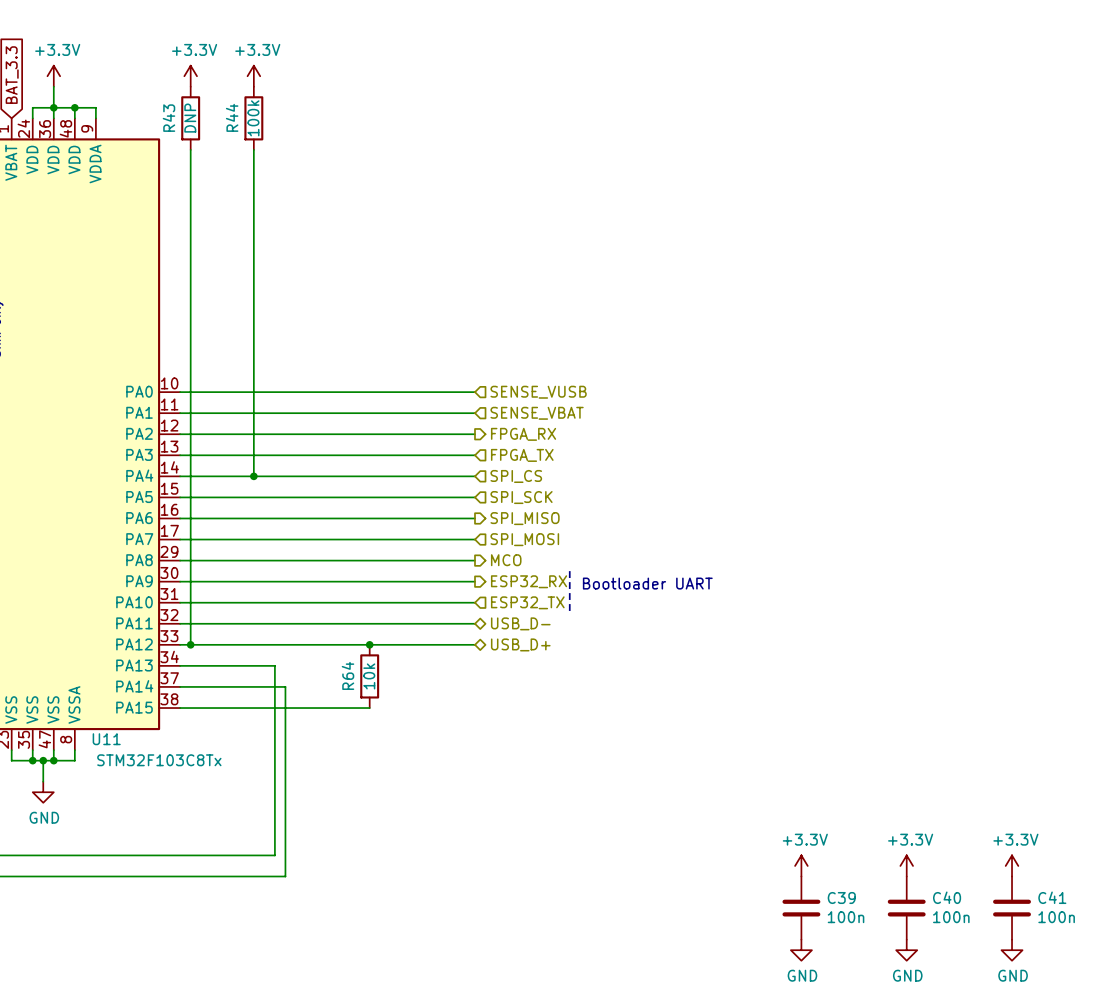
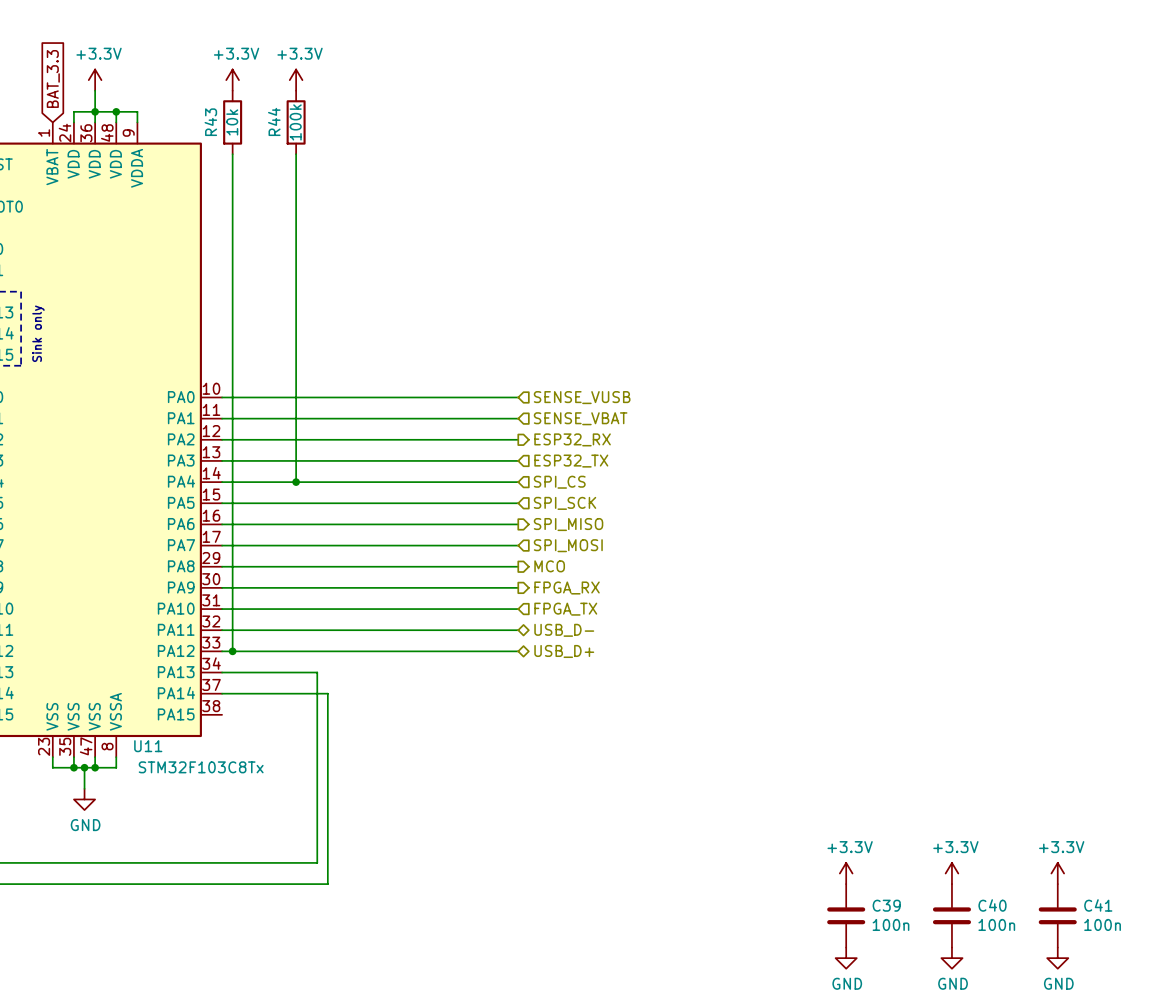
R43 value: DNP (190, 118) -> 10k (232, 122)
hierarchical label: FPGA_RX (523, 434) -> ESP32_RX (572, 439)
hierarchical label: FPGA_TX (522, 455) -> ESP32_TX (571, 461)
line: (569, 571) (569, 613) -> none
hierarchical label: ESP32_RX (529, 581) -> FPGA_RX (567, 588)
text: Bootloader UART (647, 583) -> none
hierarchical label: ESP32_TX (527, 602) -> FPGA_TX (565, 609)
junction: (369, 644) -> none
R64: 10k (369, 676) -> none
wire: (180, 708) (369, 708) -> none

